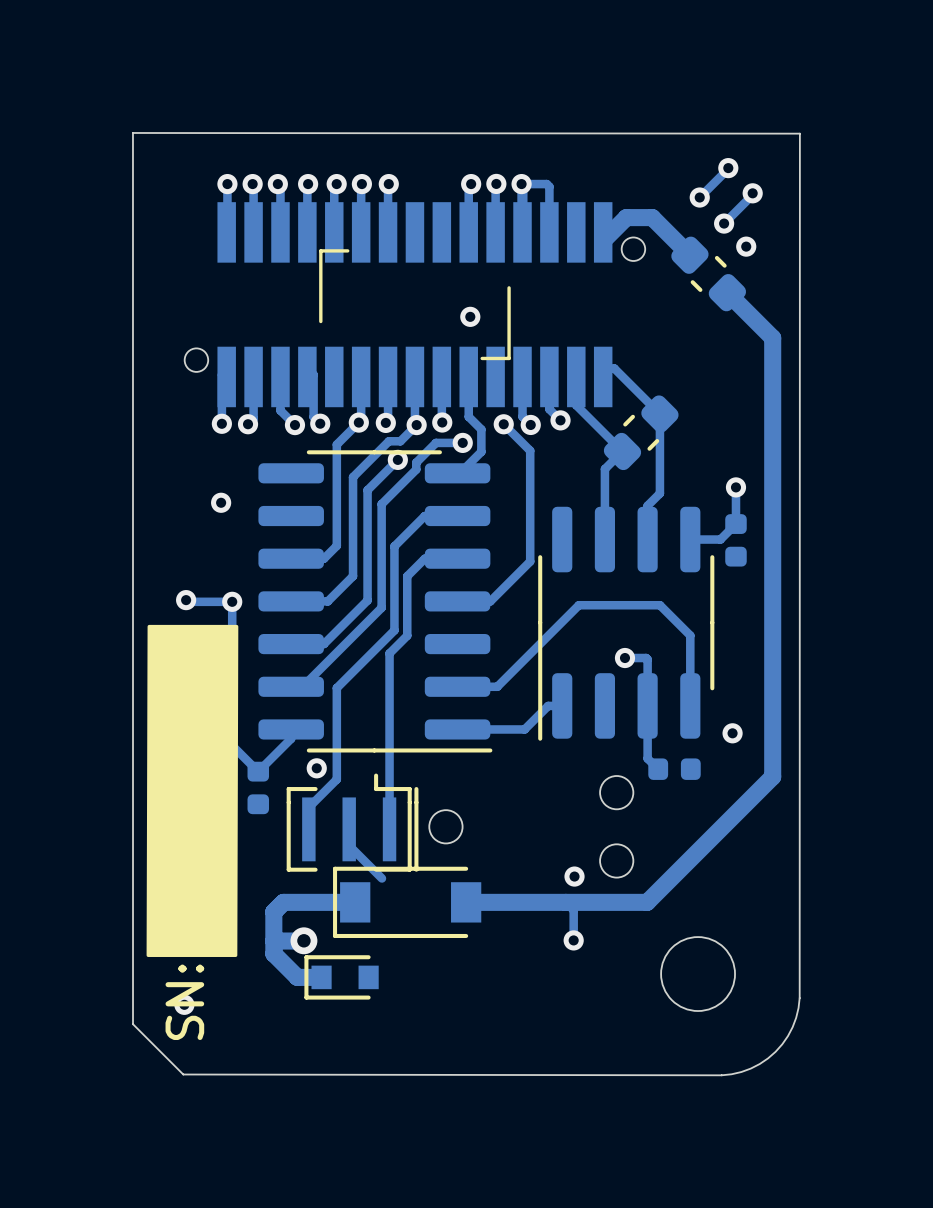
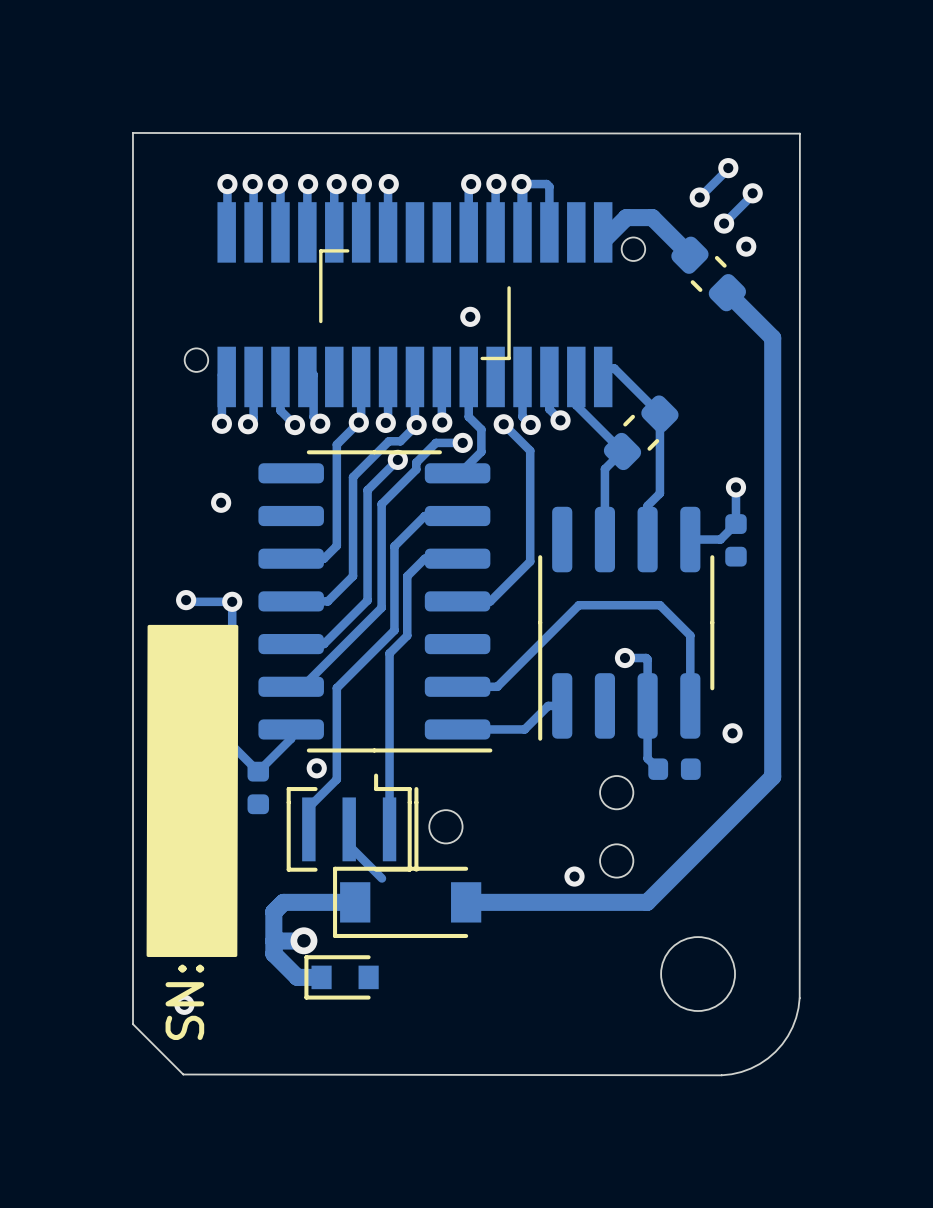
track: (565, 902) (573, 910) (573, 940) -> none
via: (573, 940) -> none

